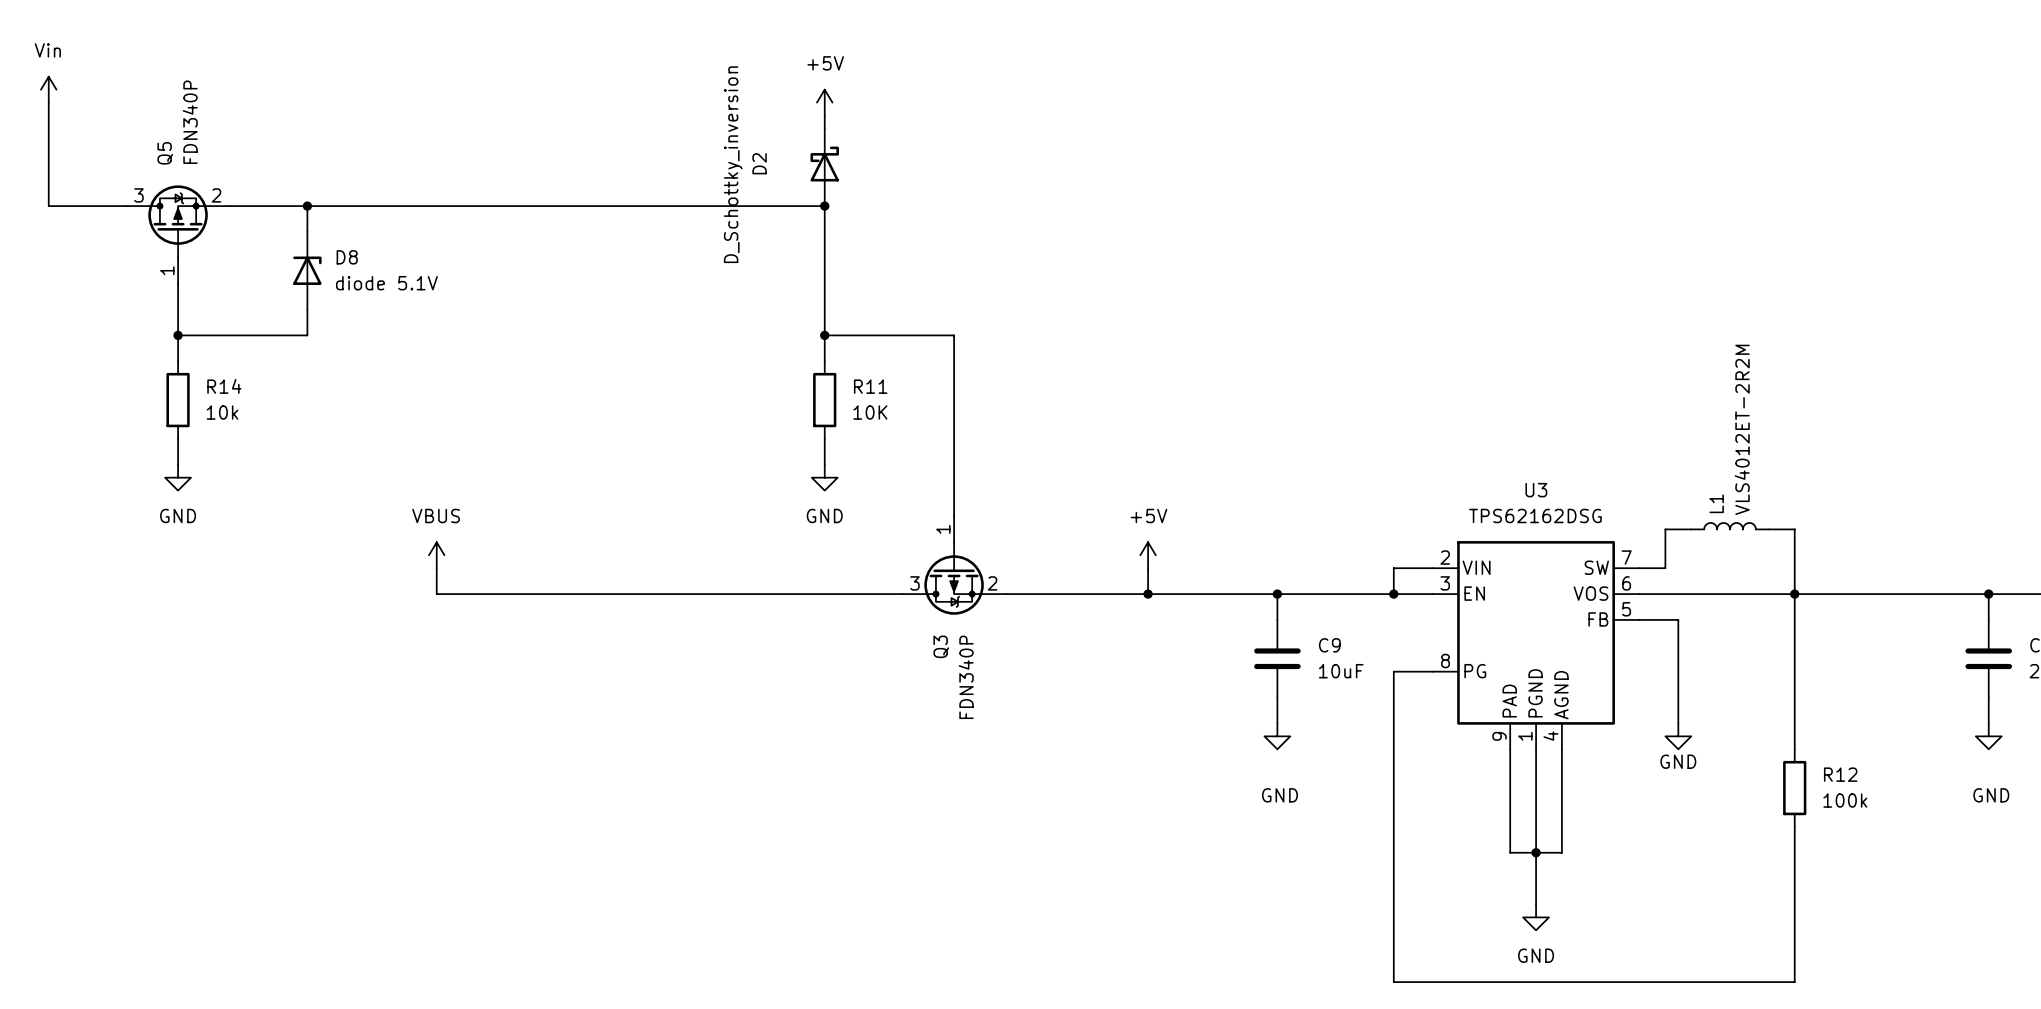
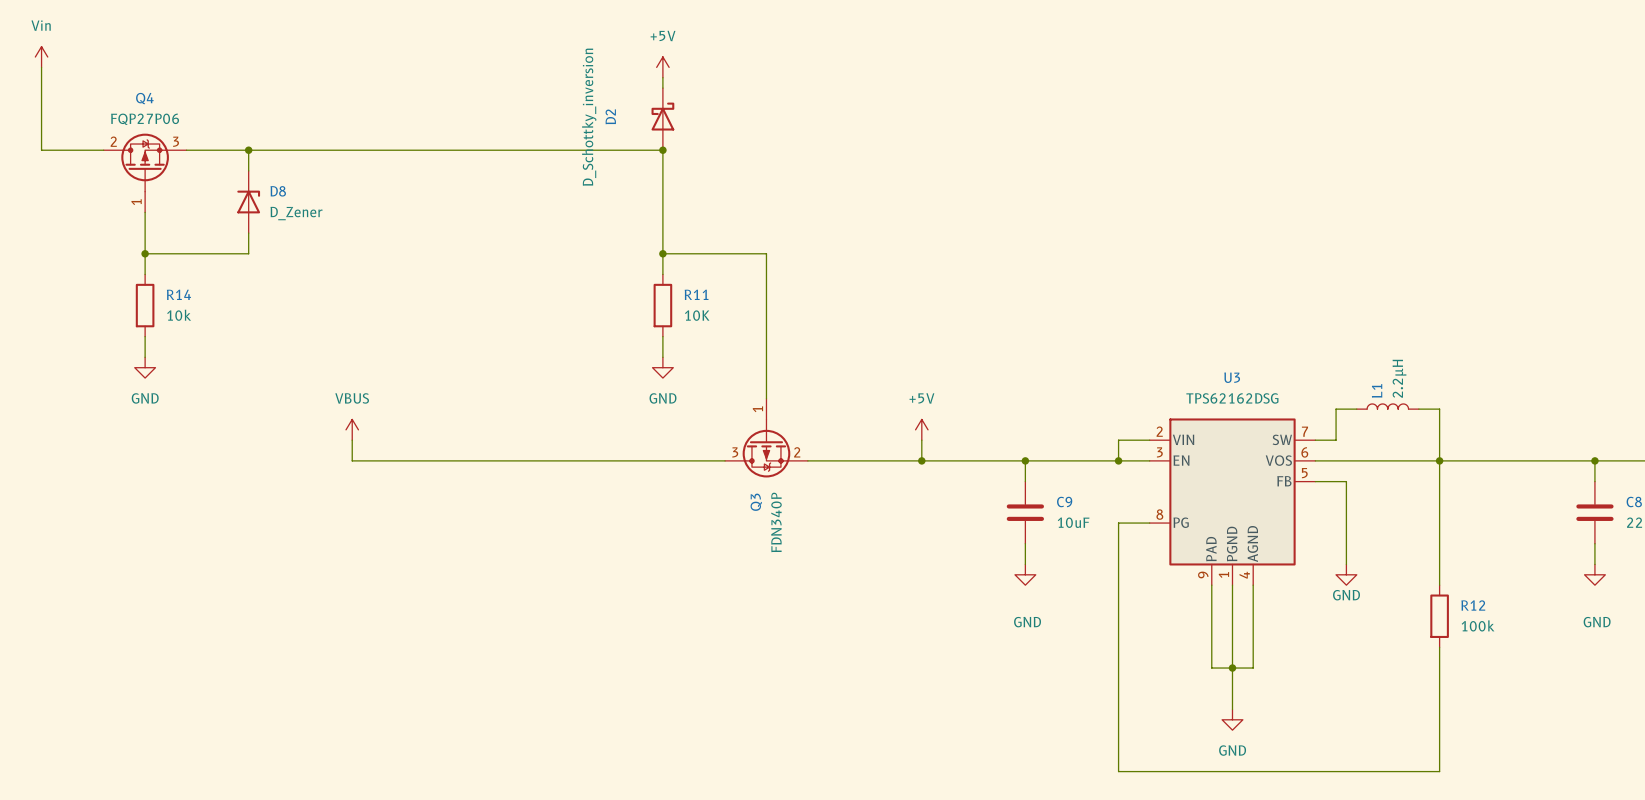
Q5 value: FDN340P (190, 122) -> FQP27P06 (145, 119)
Q5 name: Q5 (165, 153) -> Q4 (144, 98)
Q5 pin number: 3 (138, 195) -> 2 (113, 141)
Q5 pin number: 2 (216, 195) -> 3 (176, 141)
D8 value: diode 5.1V (386, 283) -> D_Zener (296, 213)
L1 value: VLS4012ET-2R2M (1742, 429) -> 2.2µH (1399, 378)

